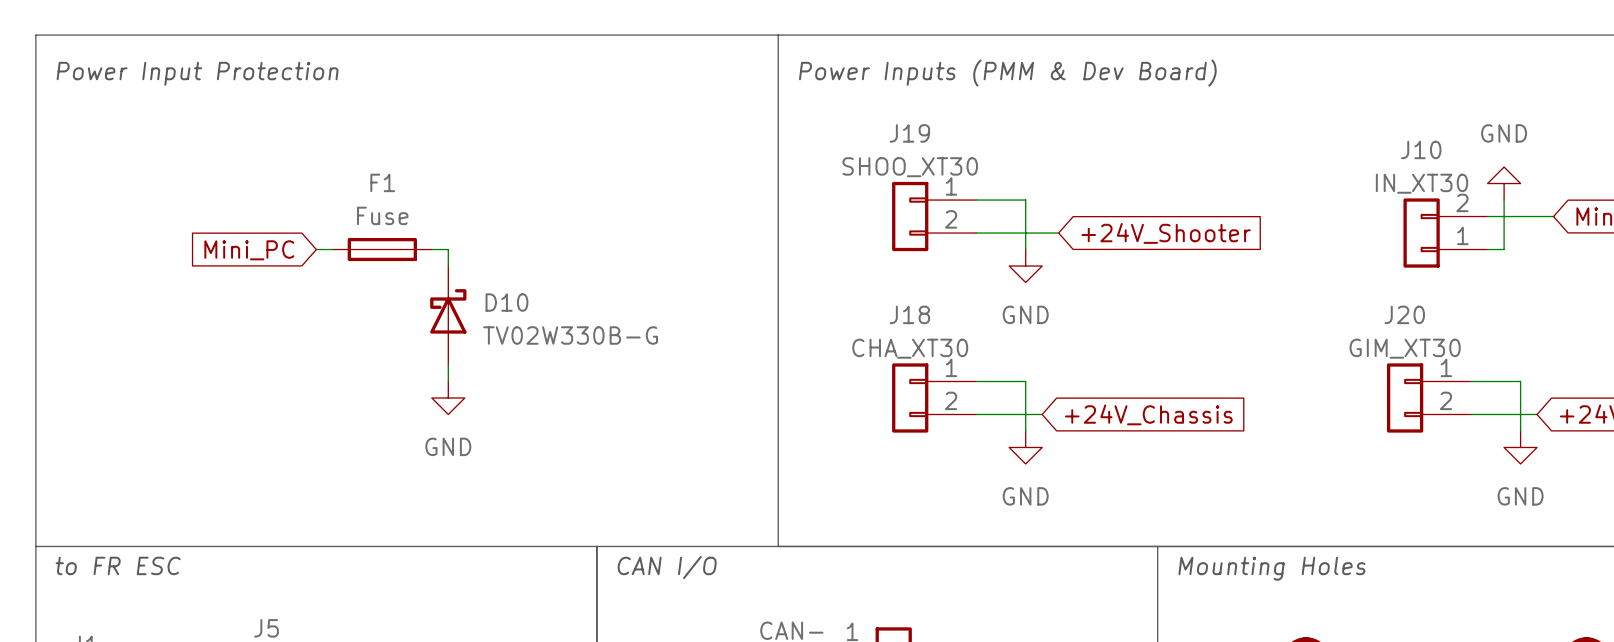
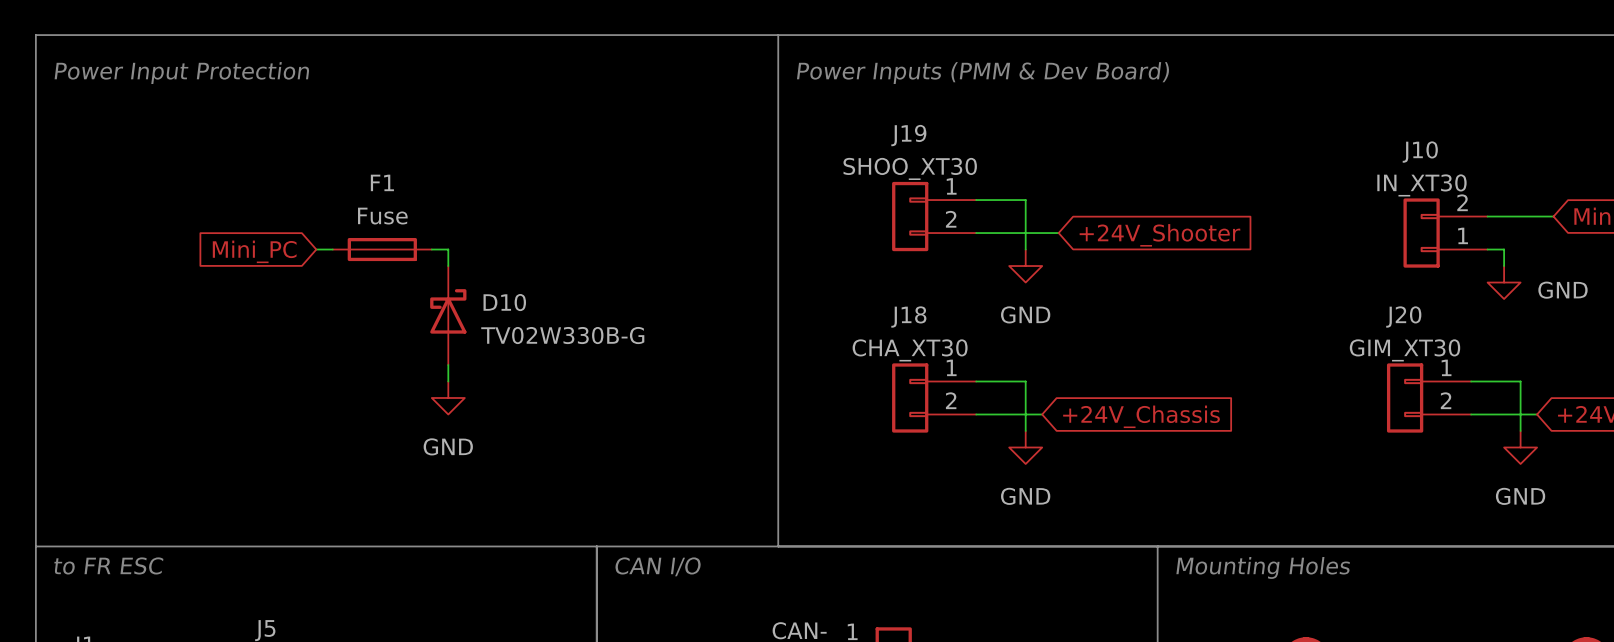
power symbol text position: GND (1504, 133) -> GND (1562, 290)
power symbol rotation: 0° (1504, 183) -> 180° (1504, 282)
power symbol position: GND (1504, 183) -> GND (1504, 282)
wire: (1504, 200) (1504, 249) -> (1504, 266) (1504, 249)

